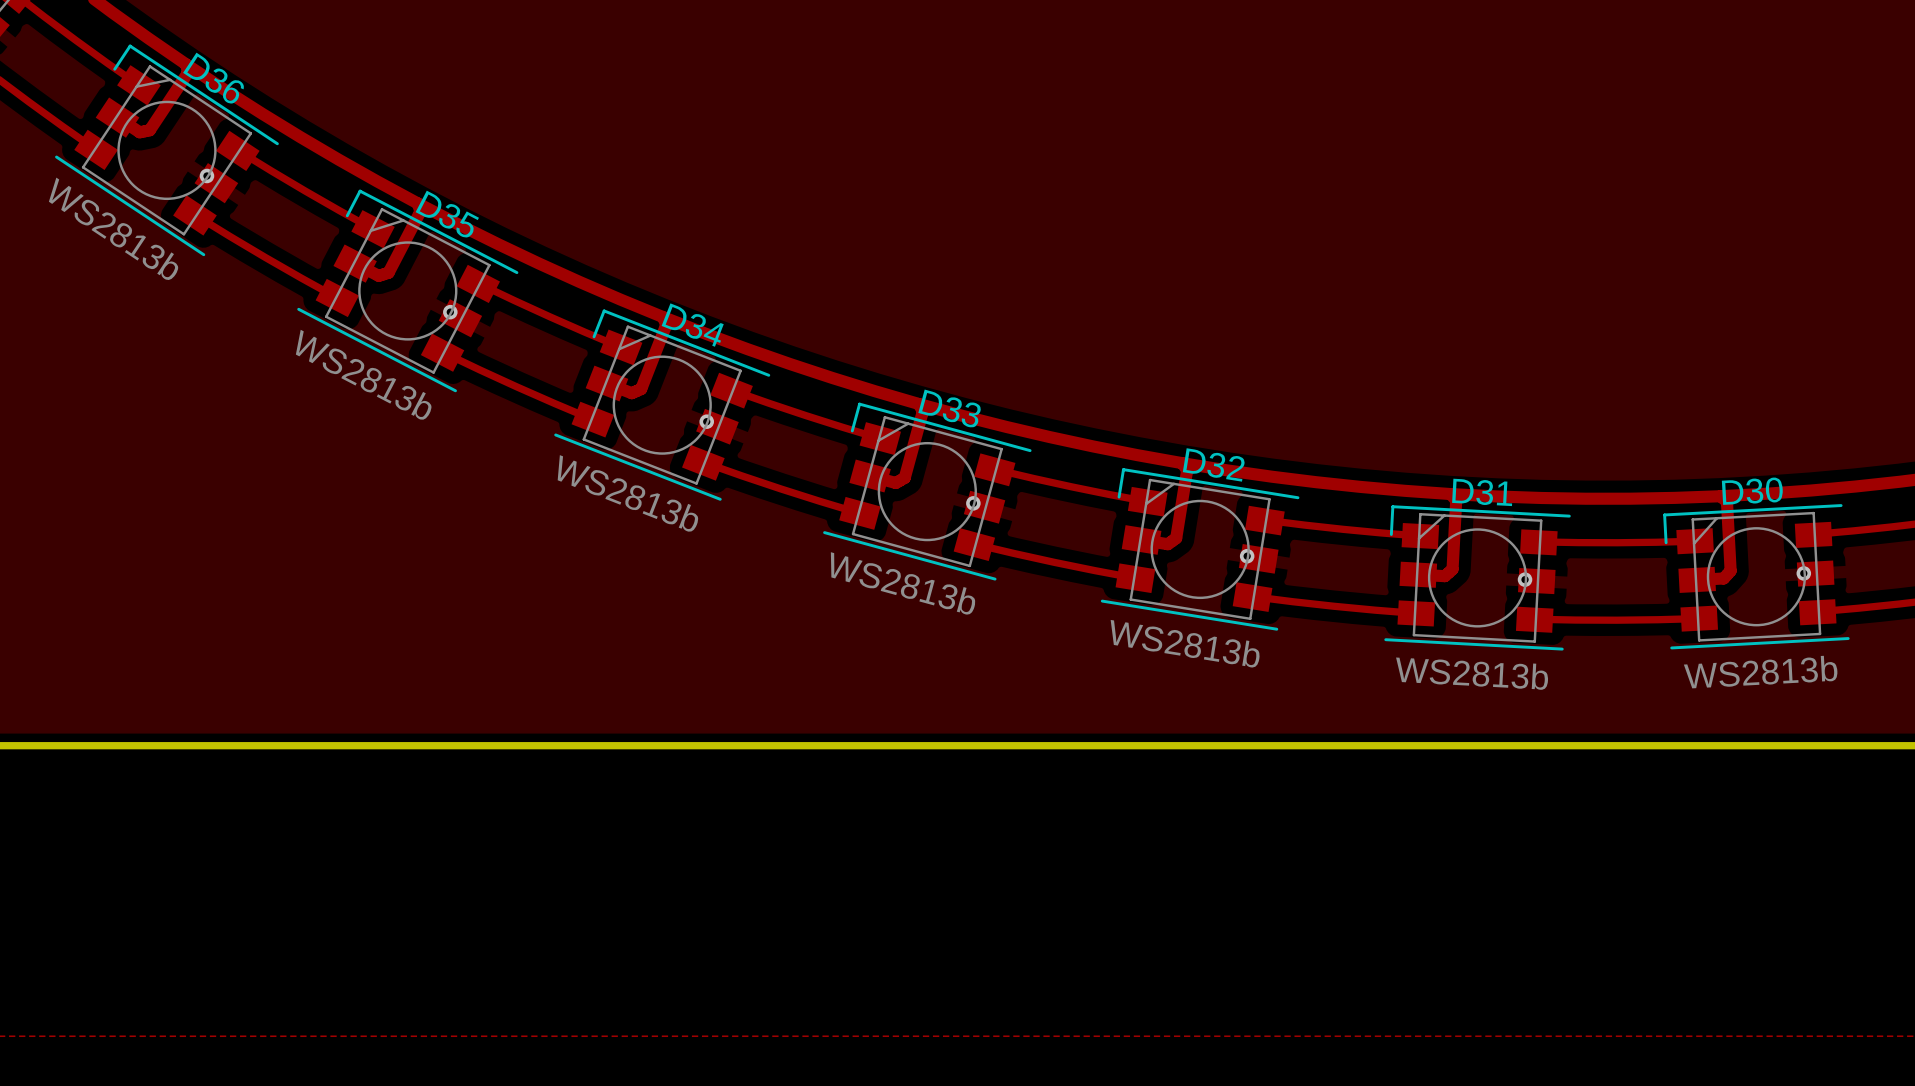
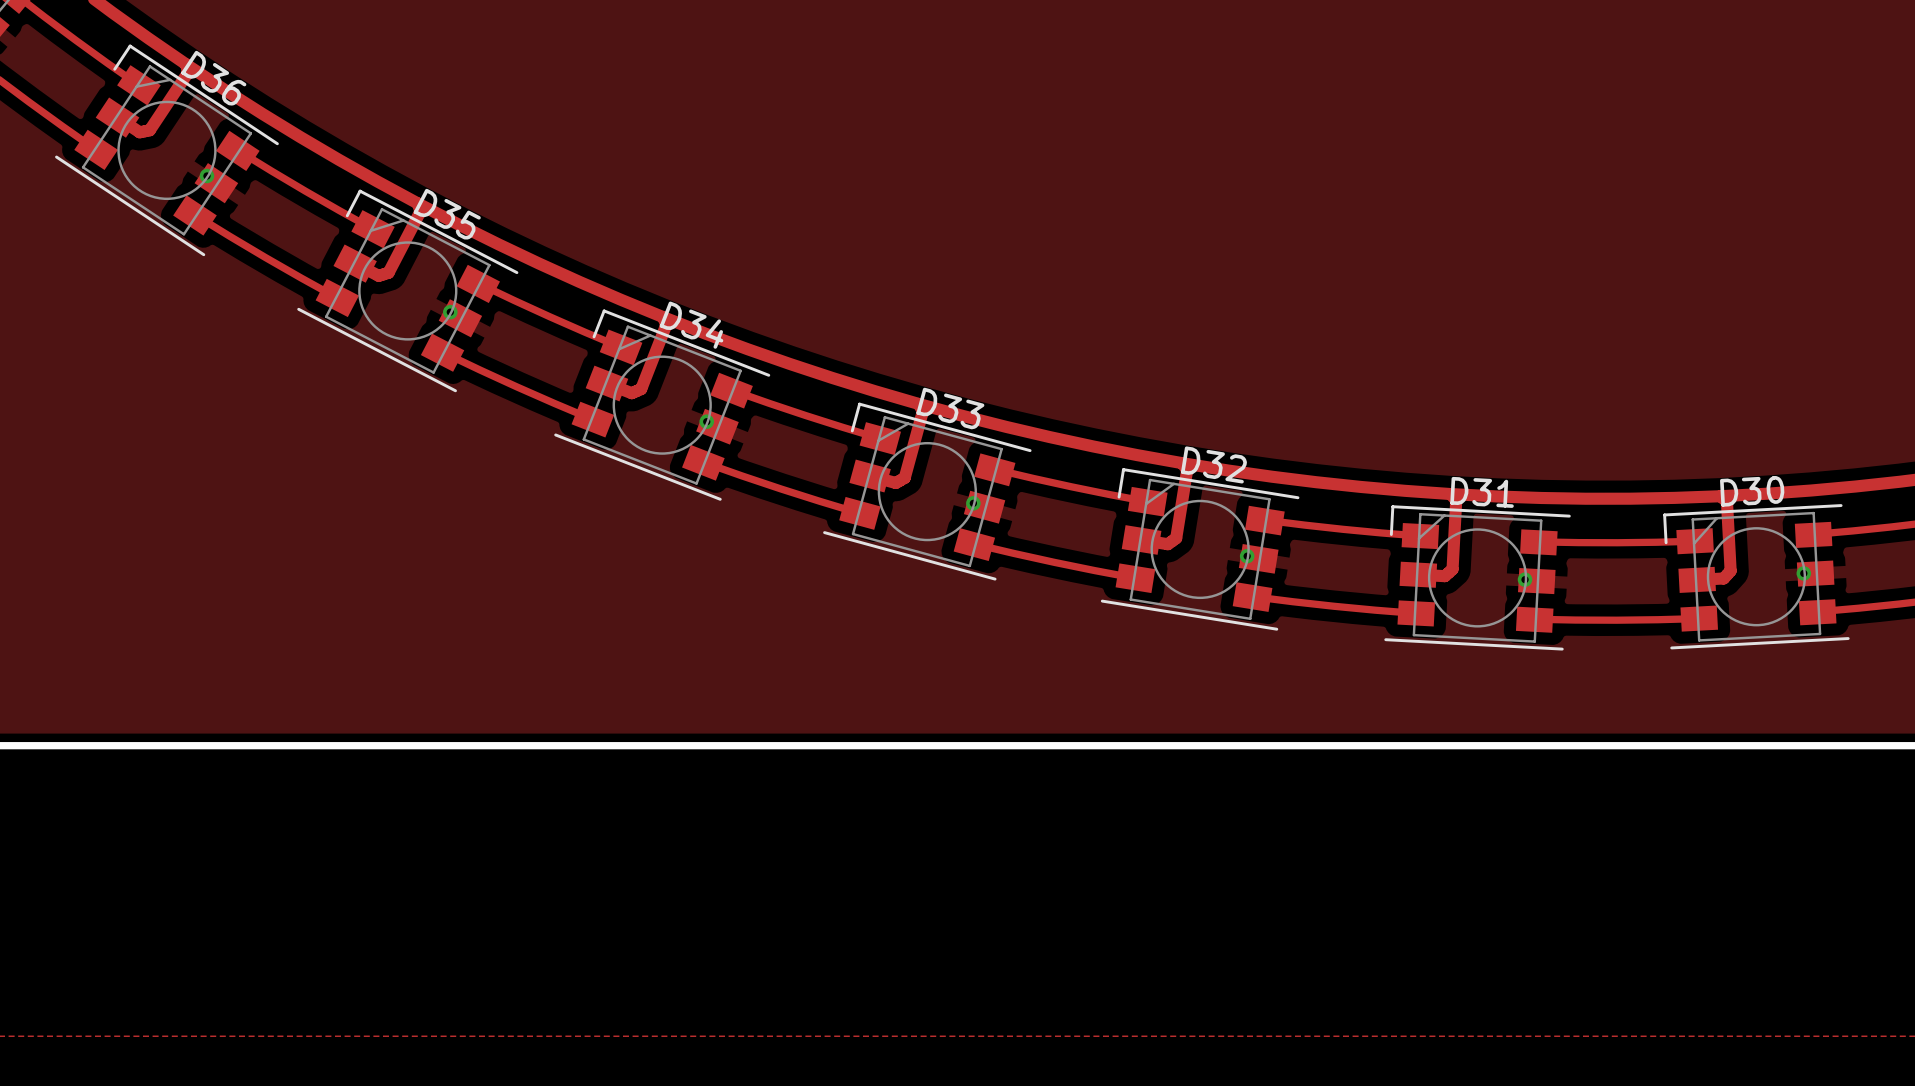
D36 value: WS2813b (113, 230) -> none
D35 value: WS2813b (363, 375) -> none
D34 value: WS2813b (628, 494) -> none
D33 value: WS2813b (903, 584) -> none
D32 value: WS2813b (1185, 644) -> none
D30 value: WS2813b (1760, 672) -> none
D31 value: WS2813b (1472, 673) -> none

